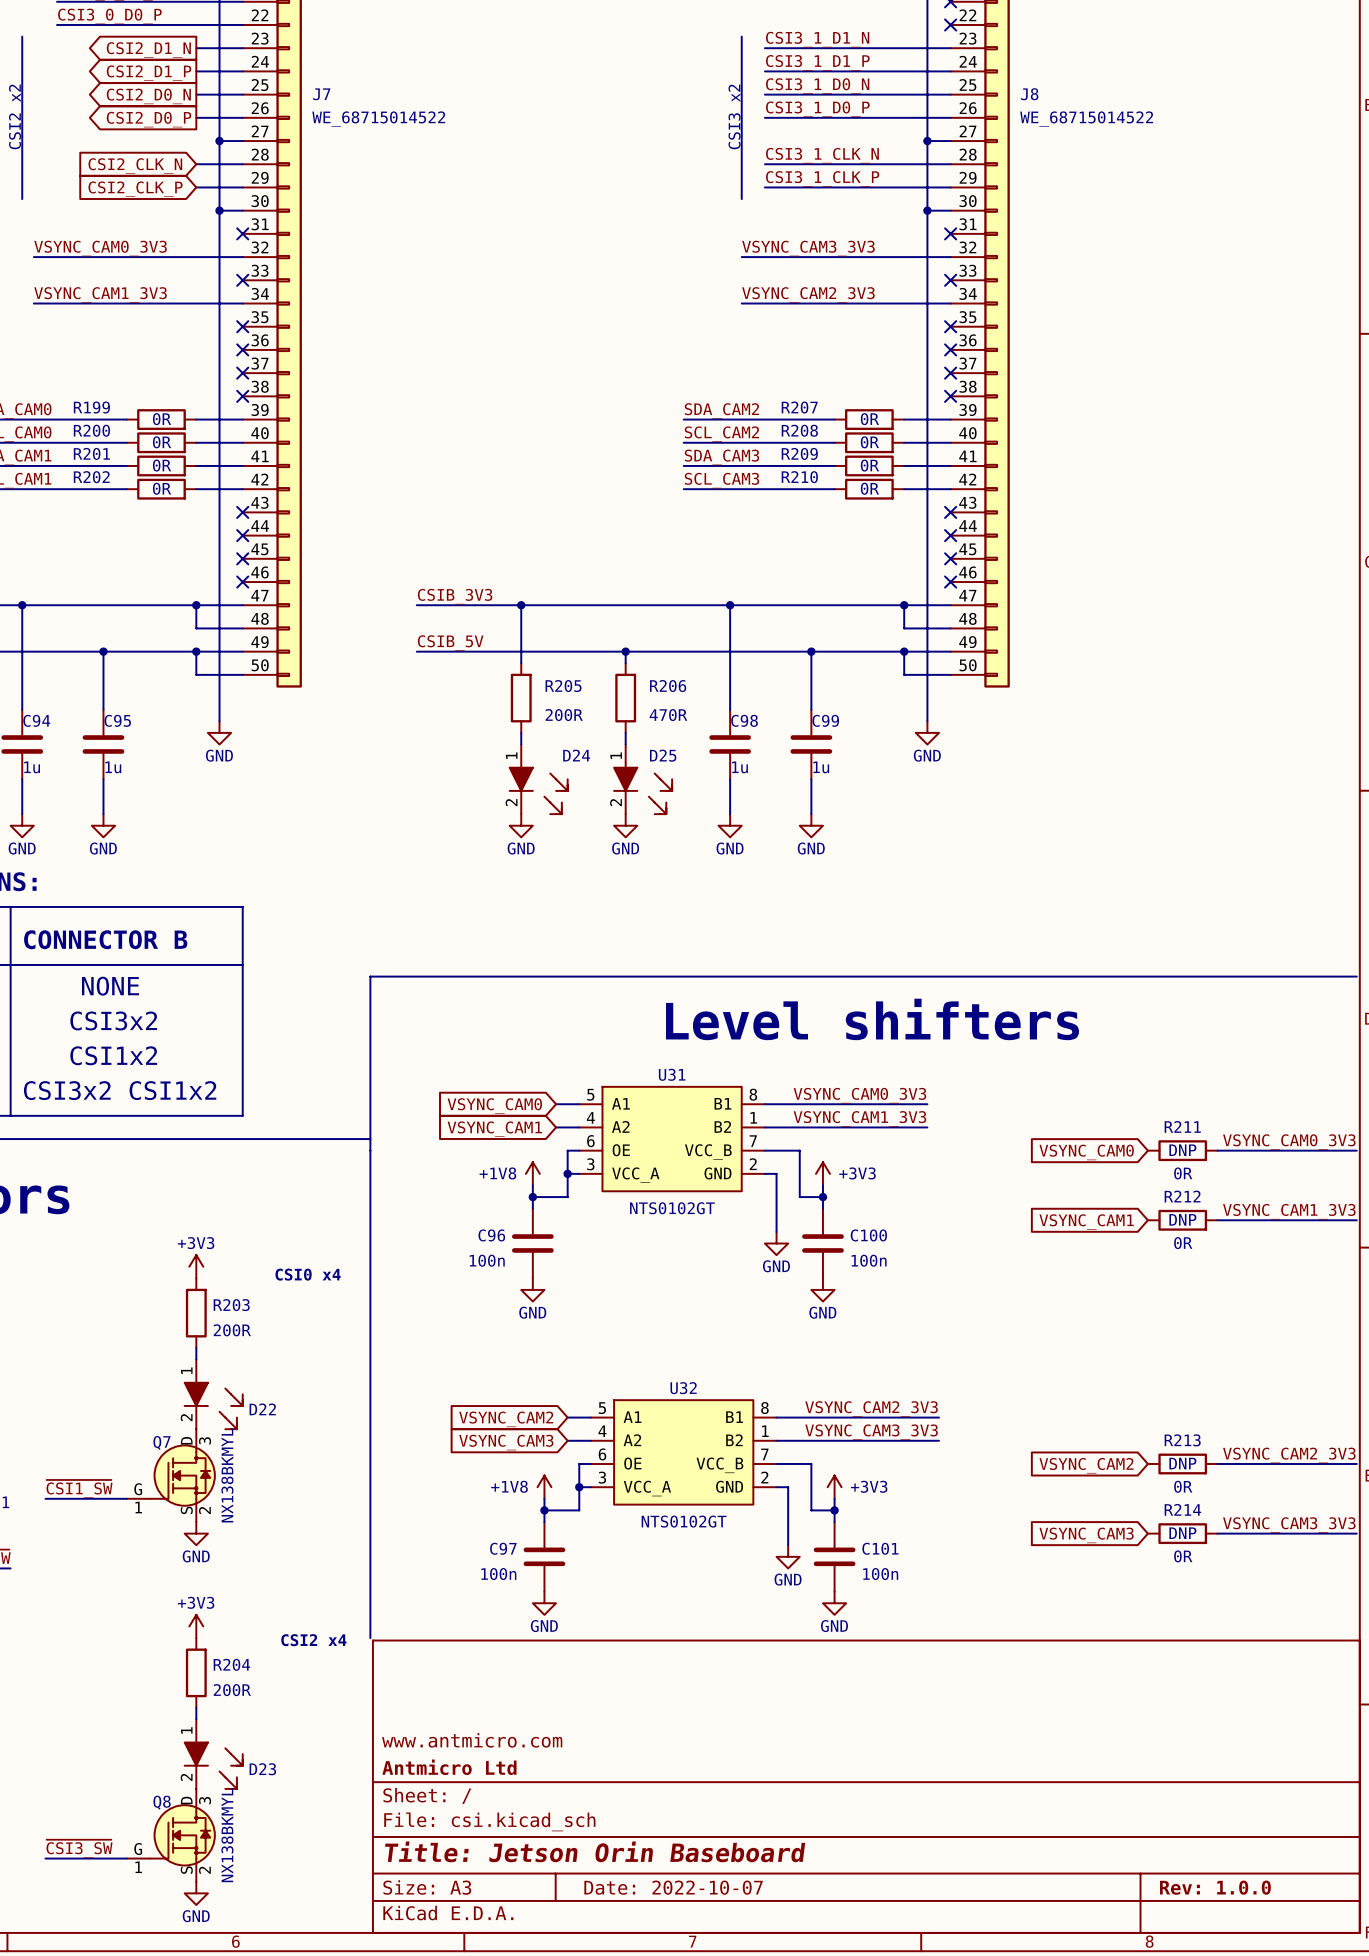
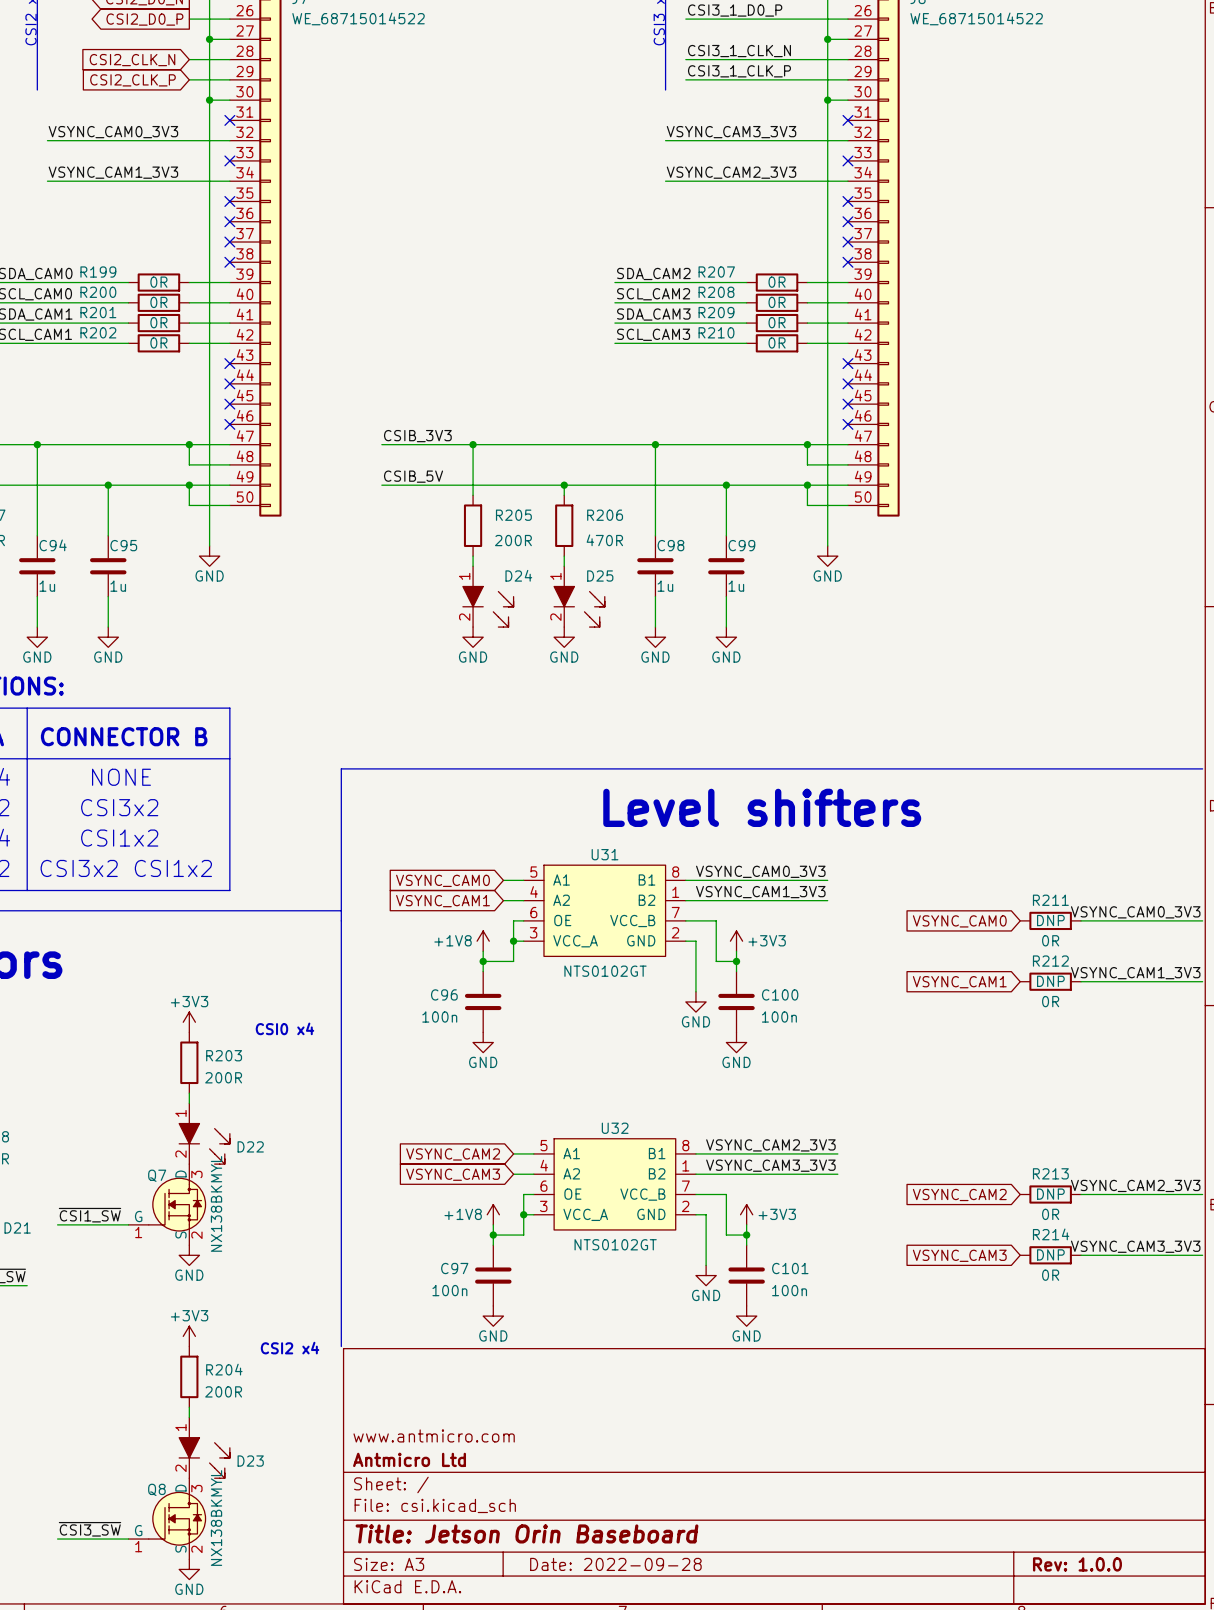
title block: Date: 2022-10-07 (673, 1887) -> Date: 2022-09-28 (615, 1564)

